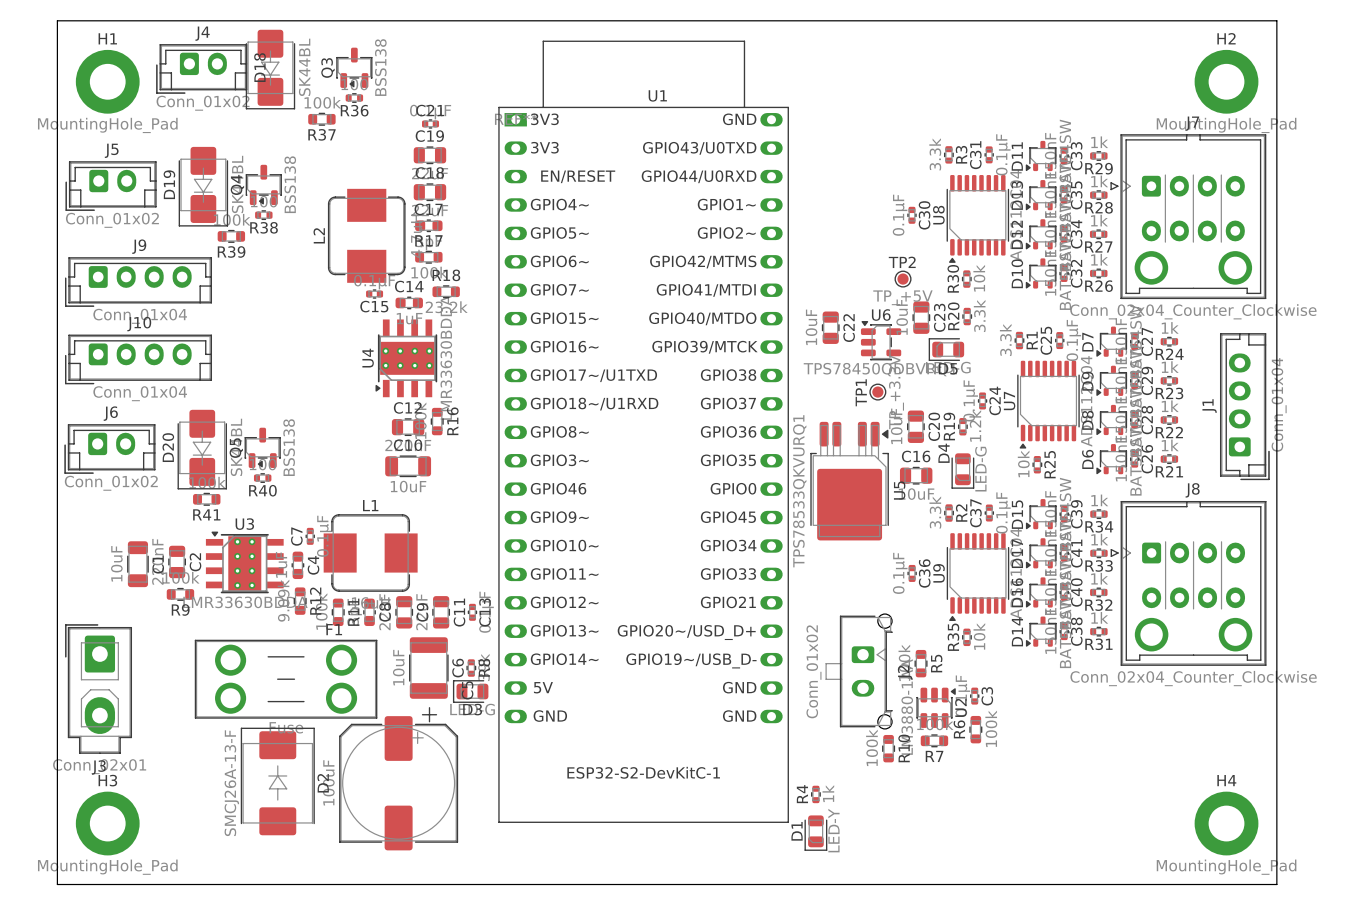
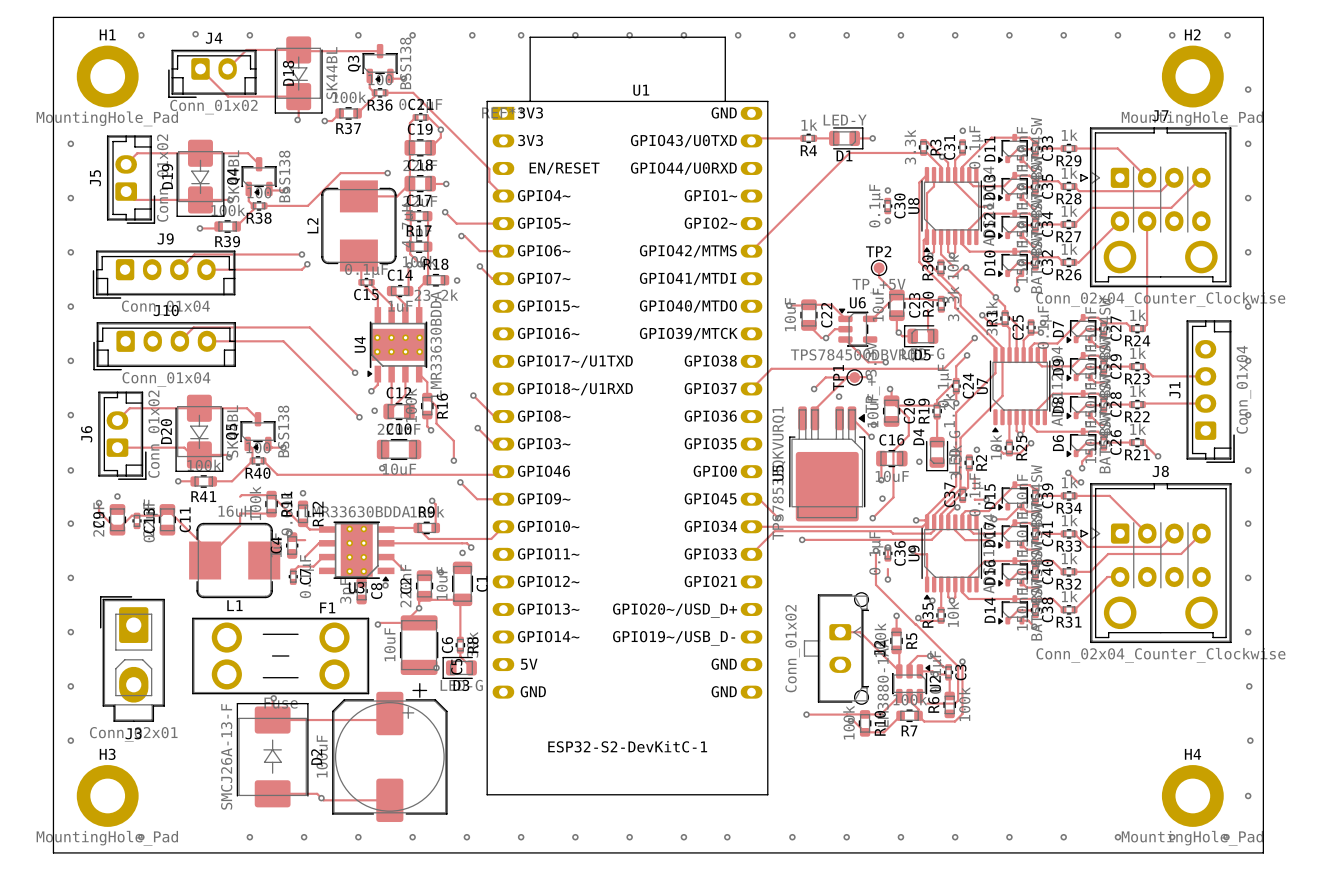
board edge: (57, 20) (57, 884) (1276, 884) (1276, 20) -> (58, 17) (53, 17) (53, 852) (1263, 852) (1263, 17) (1241, 17)
via: none -> (195, 34)
via: none -> (141, 35)
via: none -> (249, 35)
via: none -> (358, 35)
via: none -> (412, 35)
via: none -> (472, 35)
via: none -> (521, 35)
via: none -> (575, 35)
via: none -> (629, 35)
via: none -> (683, 35)
via: none -> (738, 35)
via: none -> (792, 35)
via: none -> (846, 35)
via: none -> (900, 35)
via: none -> (955, 35)
via: none -> (1009, 35)
via: none -> (1063, 35)
via: none -> (1117, 35)
via: none -> (1172, 35)
via: none -> (1227, 35)
track: none -> (380, 51) (246, 49) (227, 68)
Q3 position: (354, 67) -> (380, 63)
J4 position: (201, 68) -> (212, 73)
D18 position: (270, 69) -> (298, 75)
track: none -> (200, 68) (228, 96) (298, 96) (297, 119)
track: none -> (369, 75) (369, 88) (374, 92) (374, 96) (357, 113)
track: none -> (390, 75) (393, 78) (403, 78)
via: none -> (403, 78)
via: none -> (1248, 89)
R36 position: (354, 98) -> (380, 92)
track: none -> (385, 92) (413, 92) (489, 168) (489, 181) (503, 196)
R37 position: (321, 119) -> (348, 113)
track: none -> (339, 113) (332, 121) (324, 121)
track: none -> (415, 117) (409, 123) (410, 254) (420, 264)
track: none -> (425, 117) (428, 117) (440, 129) (440, 137) (430, 147)
via: none -> (297, 119)
via: none -> (324, 121)
via: none -> (440, 129)
via: none -> (962, 130)
track: none -> (803, 138) (754, 138) (751, 140)
track: none -> (814, 138) (834, 138)
track: none -> (854, 138) (872, 138)
via: none -> (872, 138)
track: none -> (923, 141) (927, 141) (948, 162) (948, 174)
via: none -> (70, 143)
via: none -> (1248, 143)
via: none -> (1021, 149)
track: none -> (1063, 148) (1040, 148) (1029, 137) (991, 137) (962, 166) (962, 174)
track: none -> (1074, 148) (1117, 148) (1147, 177)
track: none -> (962, 152) (955, 160) (955, 182) (978, 206) (989, 206)
track: none -> (1035, 153) (1030, 149) (1017, 149) (1007, 159)
via: none -> (942, 156)
track: none -> (1021, 159) (1035, 170)
track: none -> (259, 164) (248, 153) (137, 153) (126, 164)
track: none -> (387, 173) (340, 173) (307, 205) (264, 205)
via: none -> (387, 173)
track: none -> (926, 174) (919, 182) (919, 262) (955, 297) (955, 307) (995, 347) (995, 373) (956, 412) (956, 486) (927, 515) (927, 522)
track: none -> (934, 174) (934, 186) (926, 193) (926, 237) (923, 240) (923, 258) (960, 295) (960, 306) (1002, 347) (1002, 395) (960, 438) (960, 488) (934, 515) (934, 530) (930, 533) (893, 533) (890, 531) (774, 531) (751, 554)
track: none -> (941, 174) (941, 166) (927, 152) (849, 152) (751, 251)
track: none -> (969, 174) (969, 182) (973, 186) (1004, 186) (1014, 175) (1029, 175) (1035, 181) (1058, 181) (1063, 186)
J5 rotation: 0° (111, 186) -> 90° counterclockwise (131, 179)
track: none -> (1174, 177) (1160, 191) (1079, 191) (1074, 186)
track: none -> (1201, 177) (1171, 207) (1090, 207) (1074, 224)
track: none -> (409, 183) (397, 196) (358, 196)
track: none -> (430, 183) (446, 183)
via: none -> (446, 183)
via: none -> (1021, 187)
track: none -> (248, 188) (248, 201) (253, 205) (253, 209) (236, 226)
track: none -> (269, 188) (285, 190)
via: none -> (285, 190)
via: none -> (887, 190)
track: none -> (126, 191) (134, 199) (230, 200)
track: none -> (1035, 191) (1030, 187) (1017, 187) (1007, 197)
track: none -> (1021, 197) (1035, 208)
via: none -> (70, 198)
via: none -> (1248, 198)
via: none -> (230, 200)
via: none -> (989, 206)
track: none -> (445, 212) (456, 223) (503, 223)
via: none -> (445, 212)
track: none -> (427, 216) (428, 279) (419, 288) (419, 315)
via: none -> (887, 220)
track: none -> (1119, 221) (1078, 262) (1074, 262)
track: none -> (1147, 221) (1147, 324) (1142, 328)
track: none -> (1063, 224) (1040, 224) (1029, 213) (984, 213) (969, 229) (969, 237)
via: none -> (1021, 225)
track: none -> (218, 226) (216, 228) (199, 228)
via: none -> (199, 228)
track: none -> (1035, 229) (1030, 225) (1017, 225) (1007, 235)
track: none -> (1021, 235) (1035, 246)
track: none -> (461, 236) (464, 236) (479, 251) (503, 251)
via: none -> (461, 236)
track: none -> (934, 237) (934, 251) (930, 255)
track: none -> (941, 237) (941, 254) (953, 266)
track: none -> (948, 237) (948, 251) (951, 255) (955, 252) (955, 237)
track: none -> (962, 237) (962, 244) (969, 251) (1029, 251) (1035, 257) (1058, 257) (1063, 262)
via: none -> (70, 252)
via: none -> (1248, 252)
track: none -> (301, 254) (194, 254) (179, 269)
via: none -> (301, 254)
track: none -> (358, 255) (361, 257) (361, 282) (377, 298) (377, 315)
via: none -> (930, 255)
via: none -> (951, 255)
via: none -> (1021, 263)
track: none -> (307, 264) (301, 269) (206, 269)
via: none -> (307, 264)
via: none -> (420, 264)
track: none -> (409, 265) (408, 291)
via: none -> (409, 265)
track: none -> (479, 266) (492, 278) (503, 278)
via: none -> (479, 266)
track: none -> (966, 267) (1005, 306) (1005, 312) (1016, 324) (1016, 355)
track: none -> (966, 267) (962, 267) (953, 277)
via: none -> (966, 267)
track: none -> (1035, 267) (1030, 263) (1017, 263) (1007, 273)
track: none -> (879, 267) (879, 277) (900, 298) (945, 300)
J9 position: (138, 282) -> (164, 274)
track: none -> (1021, 273) (1017, 278) (1017, 289)
via: none -> (457, 280)
track: none -> (371, 282) (371, 285) (391, 305) (391, 315)
via: none -> (1017, 289)
track: none -> (391, 291) (405, 304) (405, 315)
track: none -> (896, 295) (872, 318) (870, 318)
via: none -> (995, 297)
via: none -> (945, 300)
track: none -> (789, 305) (831, 304) (845, 318)
via: none -> (789, 305)
via: none -> (70, 306)
via: none -> (1248, 306)
track: none -> (928, 309) (928, 331) (933, 336)
track: none -> (982, 315) (991, 324) (1005, 324) (1009, 328) (1009, 355)
via: none -> (982, 315)
track: none -> (896, 315) (896, 330) (902, 336) (912, 336)
via: none -> (1043, 322)
track: none -> (808, 325) (821, 338) (826, 338) (834, 329) (845, 329)
R1 position: (1019, 340) -> (1005, 318)
R1 name position: R1 (1032, 340) -> R1 (992, 318)
track: none -> (1131, 328) (1126, 323) (1103, 323) (1098, 317) (1083, 317) (1057, 343) (1034, 343) (1030, 347) (1030, 355)
via: none -> (898, 332)
track: none -> (1040, 332) (1031, 332) (1023, 340) (1023, 355)
via: none -> (1040, 332)
track: none -> (1103, 333) (1099, 329) (1086, 329) (1076, 339)
via: none -> (826, 338)
track: none -> (974, 338) (943, 368) (771, 368) (751, 388)
via: none -> (974, 338)
track: none -> (845, 339) (868, 362) (885, 362)
track: none -> (1090, 339) (1097, 346) (1103, 346)
track: none -> (179, 341) (193, 327) (309, 327) (355, 372)
track: none -> (206, 341) (283, 341) (359, 417)
J10 position: (138, 359) -> (164, 346)
track: none -> (1037, 355) (1037, 362) (1041, 366) (1072, 366) (1083, 355) (1098, 355) (1109, 366) (1131, 366)
track: none -> (967, 355) (956, 366) (956, 380) (937, 399) (937, 405) (896, 405)
via: none -> (967, 355)
via: none -> (70, 360)
via: none -> (1248, 360)
via: none -> (885, 362)
track: none -> (1142, 366) (1152, 376) (1205, 376)
track: none -> (1103, 371) (1099, 367) (1086, 367) (1076, 377)
via: none -> (355, 372)
track: none -> (377, 374) (377, 384) (371, 391)
track: none -> (391, 374) (391, 408)
track: none -> (405, 374) (405, 394) (388, 411)
track: none -> (419, 374) (427, 382) (427, 397) (436, 406) (436, 423) (453, 440) (453, 460)
track: none -> (869, 377) (825, 377) (814, 389)
via: none -> (869, 377)
track: none -> (846, 377) (814, 409) (814, 418)
track: none -> (1090, 377) (1095, 382) (1103, 382)
via: none -> (814, 389)
track: none -> (890, 389) (891, 400) (908, 418) (908, 435) (893, 450) (893, 497) (872, 518)
via: none -> (890, 389)
via: none -> (371, 391)
track: none -> (956, 391) (956, 403)
track: none -> (473, 395) (494, 416) (503, 416)
via: none -> (473, 395)
via: none -> (839, 396)
via: none -> (956, 403)
track: none -> (1205, 403) (1142, 404)
track: none -> (1131, 404) (1109, 404) (1098, 393) (1053, 393) (1037, 409) (1037, 417)
track: none -> (1103, 409) (1099, 405) (1086, 405) (1076, 415)
via: none -> (374, 410)
via: none -> (70, 415)
track: none -> (427, 415) (427, 426) (431, 430)
via: none -> (1248, 415)
track: none -> (1090, 415) (1099, 424) (1104, 424)
track: none -> (937, 416) (937, 442)
via: none -> (359, 417)
track: none -> (1009, 417) (1009, 442)
track: none -> (1016, 417) (1016, 430) (1020, 434) (1023, 431) (1023, 417)
track: none -> (1030, 417) (1030, 425) (1037, 431) (1098, 431) (1109, 442) (1131, 442)
track: none -> (852, 418) (871, 436)
track: none -> (258, 419) (247, 408) (129, 408) (117, 420)
via: none -> (873, 424)
track: none -> (477, 428) (493, 444) (503, 444)
via: none -> (477, 428)
via: none -> (431, 430)
J6 rotation: 0° (109, 448) -> 90° counterclockwise (122, 435)
via: none -> (1020, 434)
via: none -> (871, 436)
track: none -> (1030, 442) (1019, 453) (1003, 453) (998, 448)
via: none -> (1031, 443)
track: none -> (1142, 442) (1158, 456)
track: none -> (247, 443) (252, 448) (252, 460) (232, 481) (209, 481)
track: none -> (268, 443) (272, 447) (283, 447)
track: none -> (117, 447) (184, 447) (191, 454) (226, 454) (229, 457)
via: none -> (283, 447)
track: none -> (1103, 447) (1099, 443) (1086, 443) (1076, 453)
via: none -> (998, 448)
via: none -> (976, 449)
track: none -> (1090, 453) (1082, 461) (1082, 468)
via: none -> (1158, 456)
via: none -> (229, 457)
track: none -> (881, 458) (881, 480)
via: none -> (453, 460)
track: none -> (263, 460) (277, 474) (500, 474) (503, 471)
via: none -> (919, 461)
via: none -> (382, 468)
track: none -> (969, 468) (968, 487) (941, 514) (941, 530) (931, 539) (802, 539)
via: none -> (1082, 468)
via: none -> (70, 470)
via: none -> (1248, 470)
U5 name position: U5 (899, 490) -> U5 (778, 473)
track: none -> (1068, 472) (1077, 482) (1081, 482)
via: none -> (1068, 472)
track: none -> (974, 477) (974, 489)
via: none -> (881, 480)
track: none -> (178, 481) (192, 481)
via: none -> (178, 481)
track: none -> (460, 482) (477, 499) (503, 499)
via: none -> (460, 482)
via: none -> (1081, 482)
via: none -> (303, 493)
R2 position: (949, 513) -> (969, 462)
via: none -> (117, 496)
track: none -> (1063, 495) (1040, 495) (1029, 485) (1014, 485) (988, 511) (965, 511) (962, 514) (962, 522)
track: none -> (1074, 495) (1109, 495) (1147, 533)
track: none -> (240, 496) (241, 495) (271, 495) (299, 522) (303, 522) (309, 529) (327, 529)
via: none -> (882, 498)
track: none -> (751, 499) (759, 499) (778, 518)
track: none -> (974, 499) (986, 499)
via: none -> (986, 499)
track: none -> (432, 500) (435, 504) (435, 527)
via: none -> (432, 500)
track: none -> (99, 502) (99, 511) (117, 530) (131, 515) (161, 515) (167, 509) (205, 547) (205, 560) (240, 525) (240, 513) (271, 513)
via: none -> (99, 502)
track: none -> (957, 507) (948, 514) (948, 521)
via: none -> (957, 507)
track: none -> (1038, 511) (1026, 511) (1019, 506) (1006, 519) (994, 519)
C7 name position: C7 (296, 536) -> C7 (305, 576)
C7 position: (310, 536) -> (293, 576)
via: none -> (778, 518)
via: none -> (872, 518)
via: none -> (994, 519)
track: none -> (916, 520) (925, 520) (927, 522)
via: none -> (916, 520)
track: none -> (927, 522) (922, 526) (751, 526)
track: none -> (955, 522) (955, 530) (965, 540) (989, 540)
track: none -> (969, 522) (969, 529) (973, 533) (1004, 533) (1014, 523) (1029, 523) (1041, 533) (1063, 533)
via: none -> (70, 523)
via: none -> (1248, 523)
track: none -> (503, 526) (491, 538) (428, 538) (417, 527) (386, 529)
track: none -> (288, 533) (295, 540) (305, 540)
via: none -> (288, 533)
track: none -> (1174, 533) (1161, 546) (1087, 546) (1074, 533)
track: none -> (1201, 533) (1181, 553) (1108, 553) (1090, 571) (1074, 571)
L1 rotation: 0° (370, 553) -> 180° (234, 560)
L1 position: (370, 553) -> (234, 560)
via: none -> (802, 539)
C2 position: (177, 561) -> (424, 586)
C2 name position: C2 (195, 562) -> C2 (405, 586)
U3 rotation: 0° (244, 562) -> 180° (356, 551)
U3 position: (244, 562) -> (356, 551)
track: none -> (327, 543) (318, 543) (305, 556)
track: none -> (386, 543) (467, 543) (471, 547)
C1 position: (137, 564) -> (462, 583)
track: none -> (1021, 544) (1026, 549) (1038, 549)
C4 name position: C4 (313, 565) -> C4 (276, 545)
via: none -> (471, 547)
track: none -> (887, 547) (887, 558)
via: none -> (887, 547)
track: none -> (875, 550) (875, 584) (958, 666) (958, 700) (955, 703) (927, 703)
via: none -> (875, 550)
track: none -> (912, 550) (916, 554) (927, 554) (927, 584)
via: none -> (912, 550)
via: none -> (462, 552)
track: none -> (327, 557) (323, 557) (313, 566) (298, 566) (293, 571)
track: none -> (386, 557) (390, 557) (403, 570)
track: none -> (887, 568) (887, 579)
track: none -> (1063, 571) (1052, 561) (984, 561) (969, 576) (969, 584)
via: none -> (440, 572)
R9 position: (180, 594) -> (426, 527)
track: none -> (1035, 577) (1030, 572) (1018, 572) (1007, 582)
track: none -> (1120, 576) (1107, 576) (1074, 609)
via: none -> (70, 577)
via: none -> (1248, 577)
via: none -> (887, 579)
R12 position: (300, 601) -> (303, 513)
track: none -> (1021, 582) (1026, 587) (1038, 587)
track: none -> (941, 584) (941, 609)
track: none -> (948, 584) (948, 596) (951, 600) (955, 597) (955, 584)
track: none -> (962, 584) (962, 592) (968, 598) (1052, 598) (1063, 609)
via: none -> (385, 585)
R9 name position: R9 (180, 609) -> R9 (426, 512)
R11 position: (338, 612) -> (271, 504)
C9 position: (404, 612) -> (117, 519)
C9 name position: C9 (422, 612) -> C9 (98, 519)
C11 position: (441, 612) -> (167, 519)
C13 position: (472, 612) -> (137, 520)
via: none -> (932, 600)
via: none -> (951, 600)
via: none -> (419, 608)
track: none -> (1035, 615) (1030, 610) (1018, 610) (1007, 620)
track: none -> (896, 615) (896, 631)
via: none -> (896, 615)
track: none -> (918, 618) (921, 620) (941, 620)
via: none -> (918, 618)
track: none -> (1021, 620) (1028, 620) (1034, 626)
track: none -> (377, 624) (379, 622) (408, 622) (408, 619) (419, 608) (419, 601) (424, 596) (430, 599) (462, 599) (460, 602) (460, 639)
via: none -> (377, 624)
via: none -> (1034, 626)
via: none -> (70, 632)
track: none -> (840, 632) (860, 632) (899, 671) (899, 652) (896, 649)
via: none -> (1248, 632)
track: none -> (460, 650) (460, 656) (471, 667)
via: none -> (930, 655)
track: none -> (962, 661) (962, 714) (955, 721) (924, 721) (918, 715) (918, 709) (909, 700) (909, 696)
via: none -> (962, 661)
J3 position: (98, 689) -> (132, 659)
track: none -> (948, 667) (943, 667) (932, 655) (917, 655) (909, 664) (909, 671)
via: none -> (436, 667)
track: none -> (919, 671) (932, 671) (935, 674) (945, 674) (949, 678) (949, 695)
via: none -> (935, 674)
via: none -> (70, 686)
via: none -> (1249, 686)
track: none -> (899, 696) (880, 714) (806, 714)
track: none -> (273, 698) (272, 720) (383, 720) (389, 713)
via: none -> (273, 698)
via: none -> (806, 714)
track: none -> (900, 715) (884, 732) (865, 732) (853, 721) (851, 721)
via: none -> (851, 721)
via: none -> (70, 740)
via: none -> (1250, 740)
R4 rotation: 0° (815, 794) -> 90° clockwise (808, 138)
R4 position: (815, 794) -> (808, 138)
track: none -> (272, 793) (317, 793) (323, 800) (389, 800)
via: none -> (1248, 795)
via: none -> (321, 798)
D1 rotation: 0° (815, 833) -> 90° counterclockwise (846, 138)
D1 position: (815, 833) -> (846, 138)
via: none -> (141, 837)
via: none -> (249, 837)
via: none -> (304, 837)
via: none -> (358, 837)
via: none -> (412, 837)
via: none -> (466, 837)
via: none -> (521, 837)
via: none -> (575, 837)
via: none -> (629, 837)
via: none -> (683, 837)
via: none -> (727, 837)
via: none -> (792, 837)
via: none -> (846, 837)
via: none -> (900, 837)
via: none -> (955, 837)
via: none -> (1009, 837)
via: none -> (1063, 837)
via: none -> (1117, 837)
via: none -> (1172, 837)
via: none -> (1226, 837)

